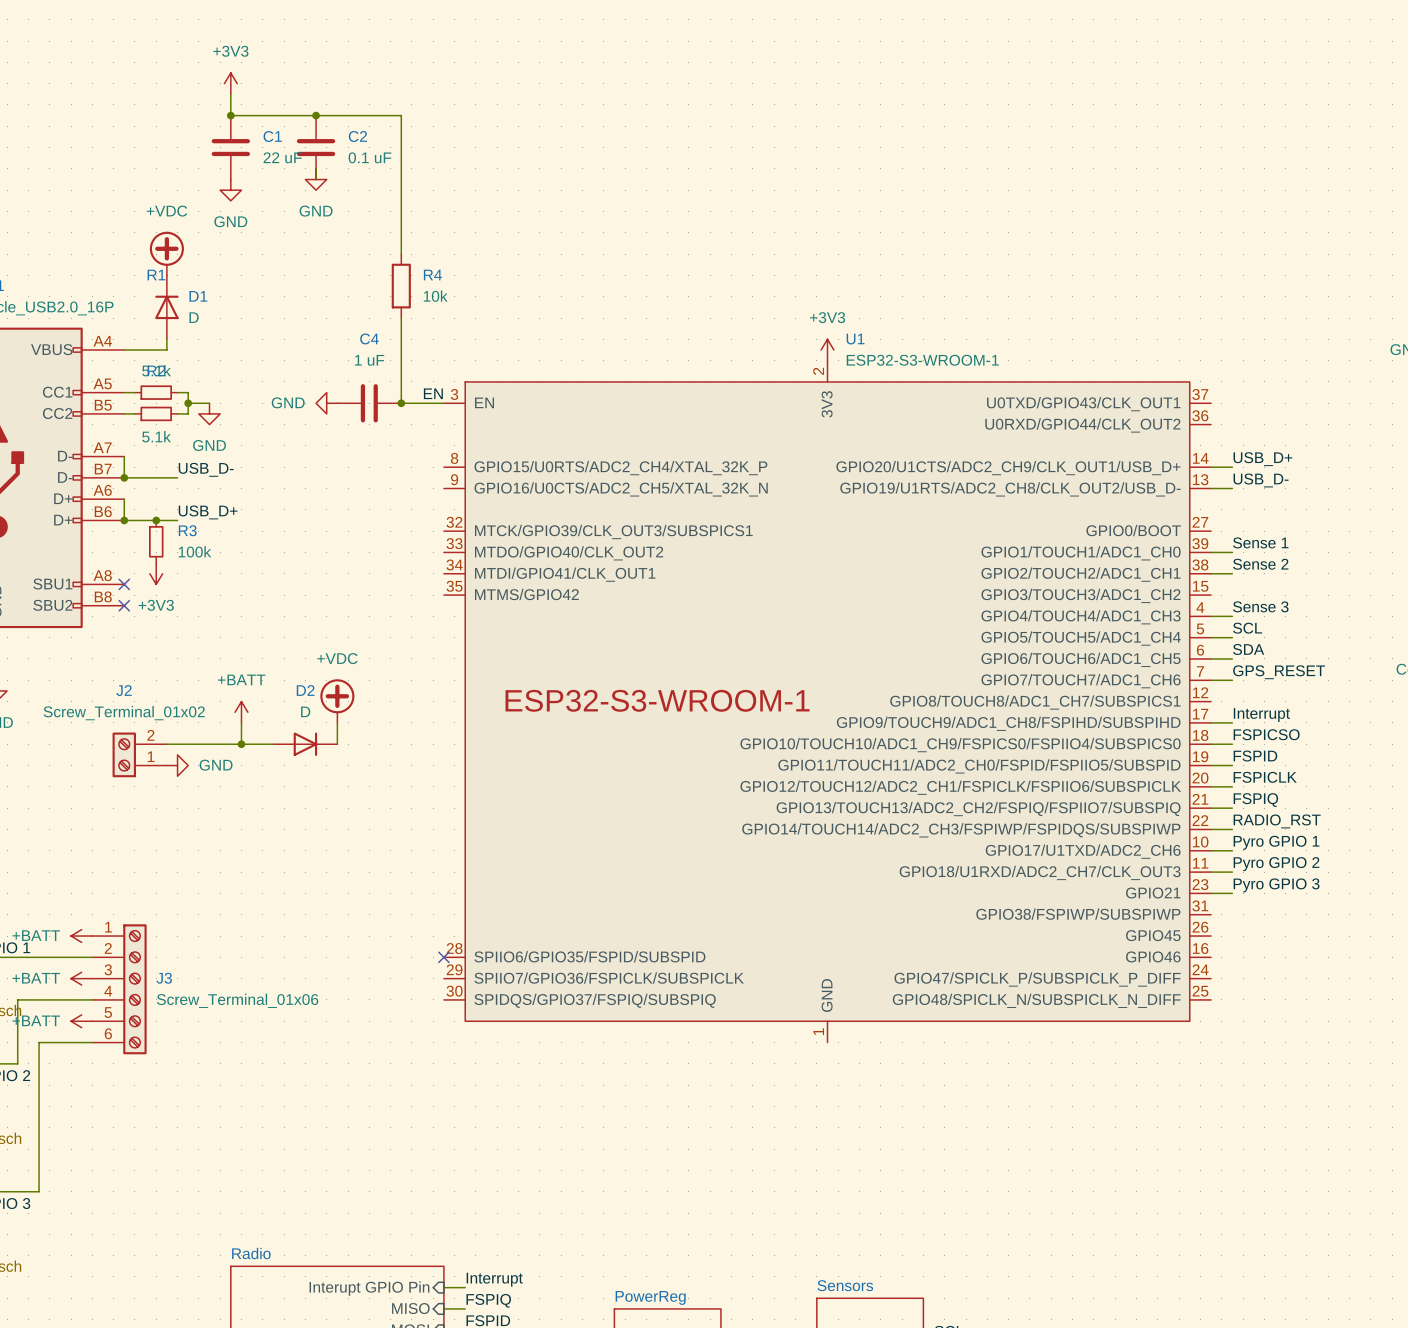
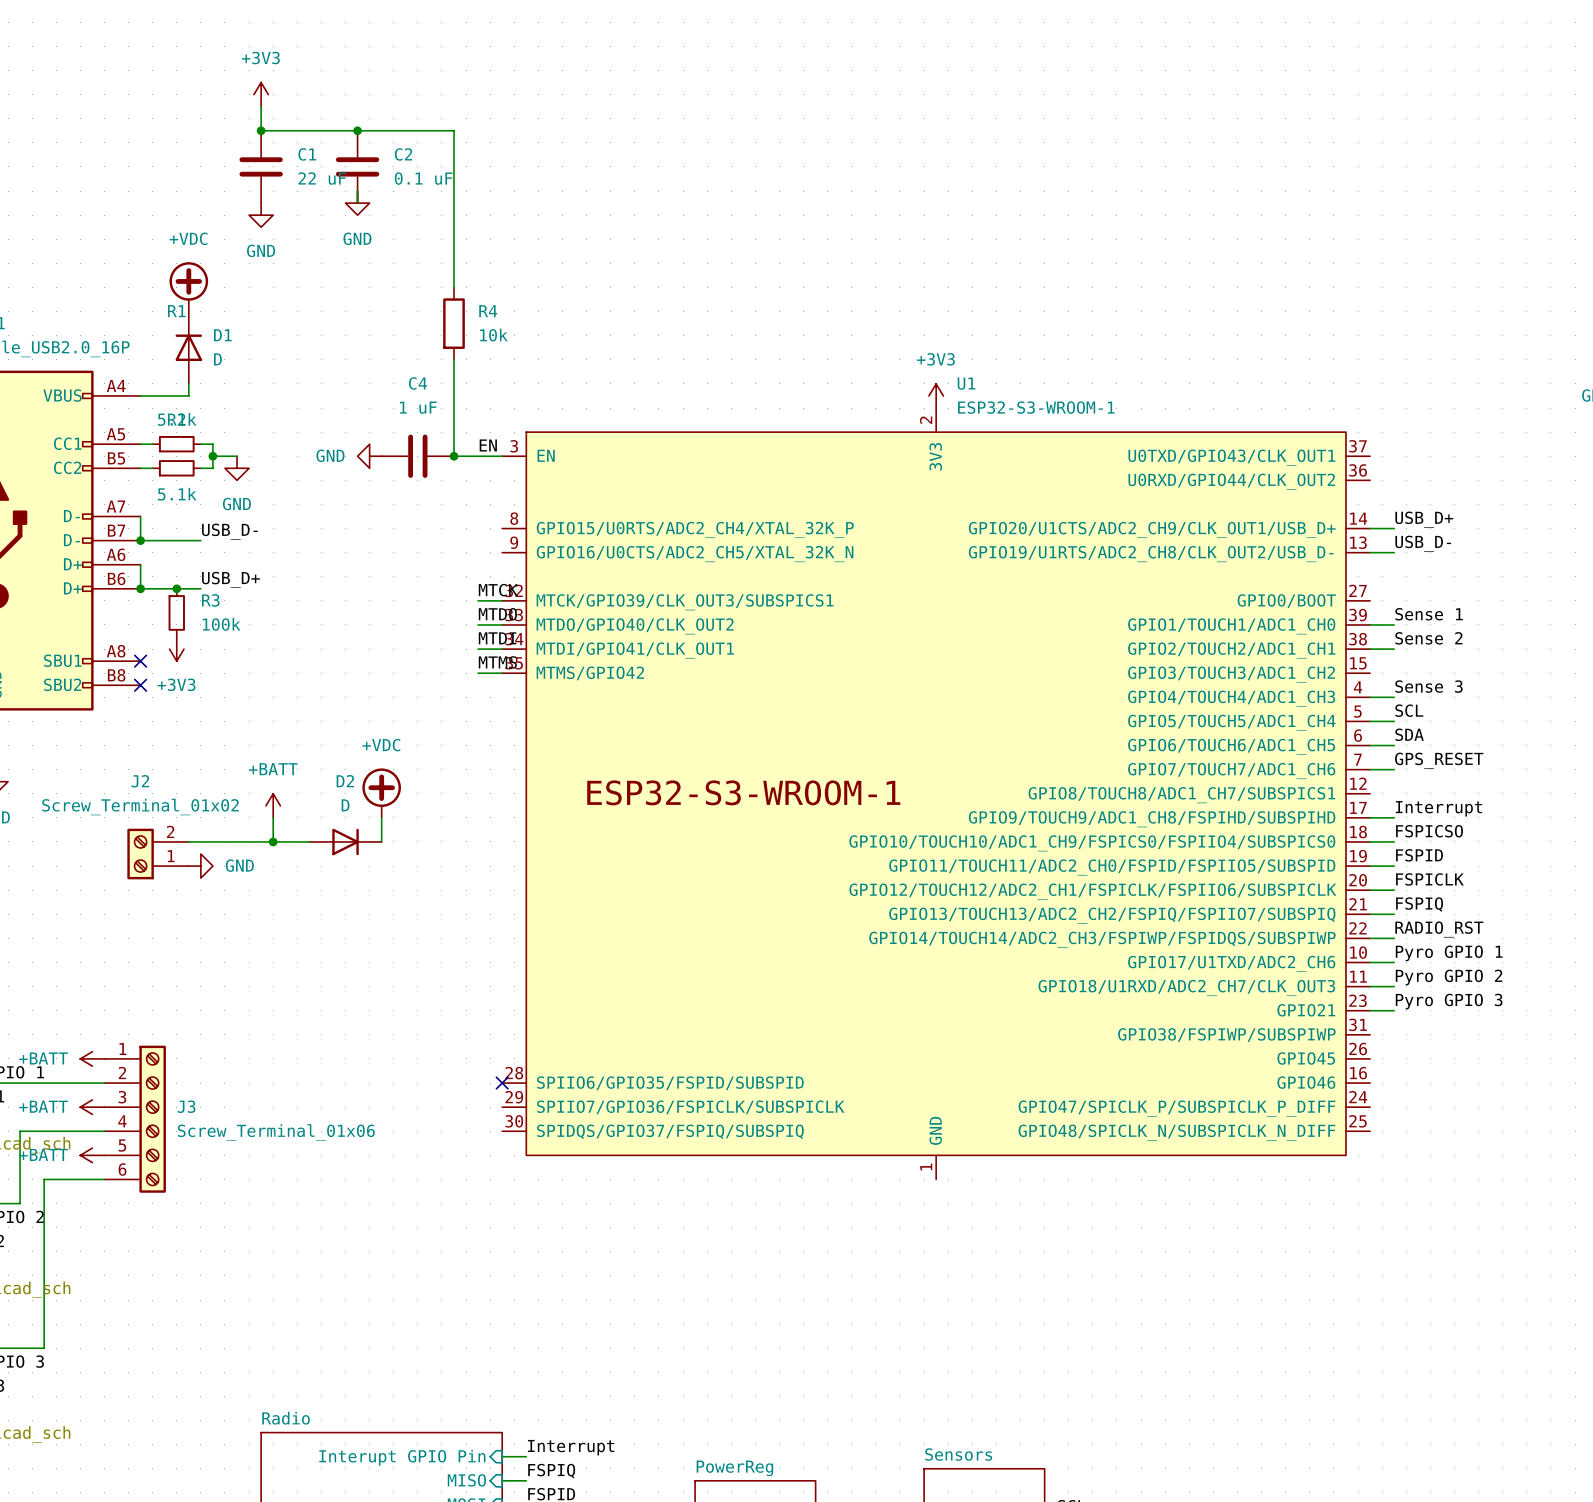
label: none -> MTCK (498, 590)
wire: none -> (478, 600) (502, 600)
label: none -> MTDO (497, 614)
wire: none -> (478, 624) (502, 624)
label: none -> MTDI (497, 638)
wire: none -> (478, 649) (502, 649)
label: none -> MTMS (497, 662)
wire: none -> (478, 673) (502, 673)

